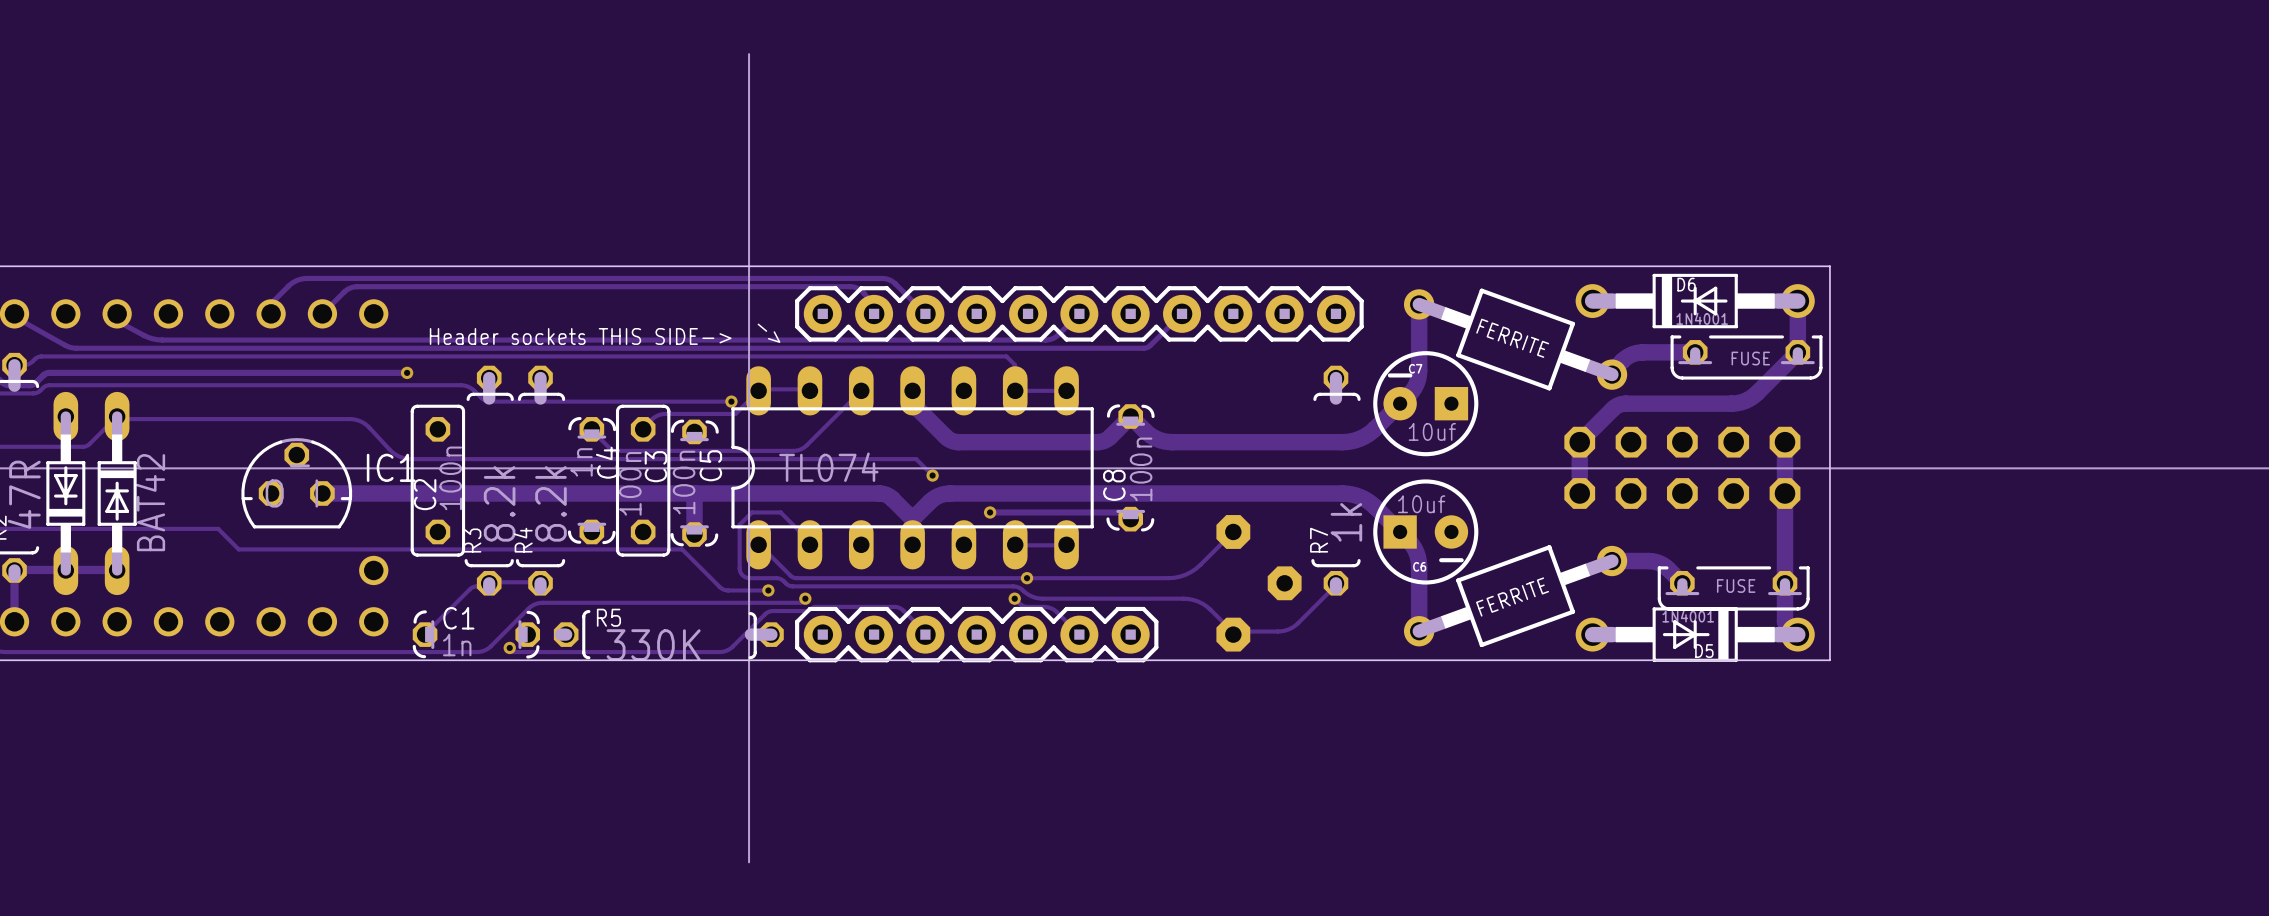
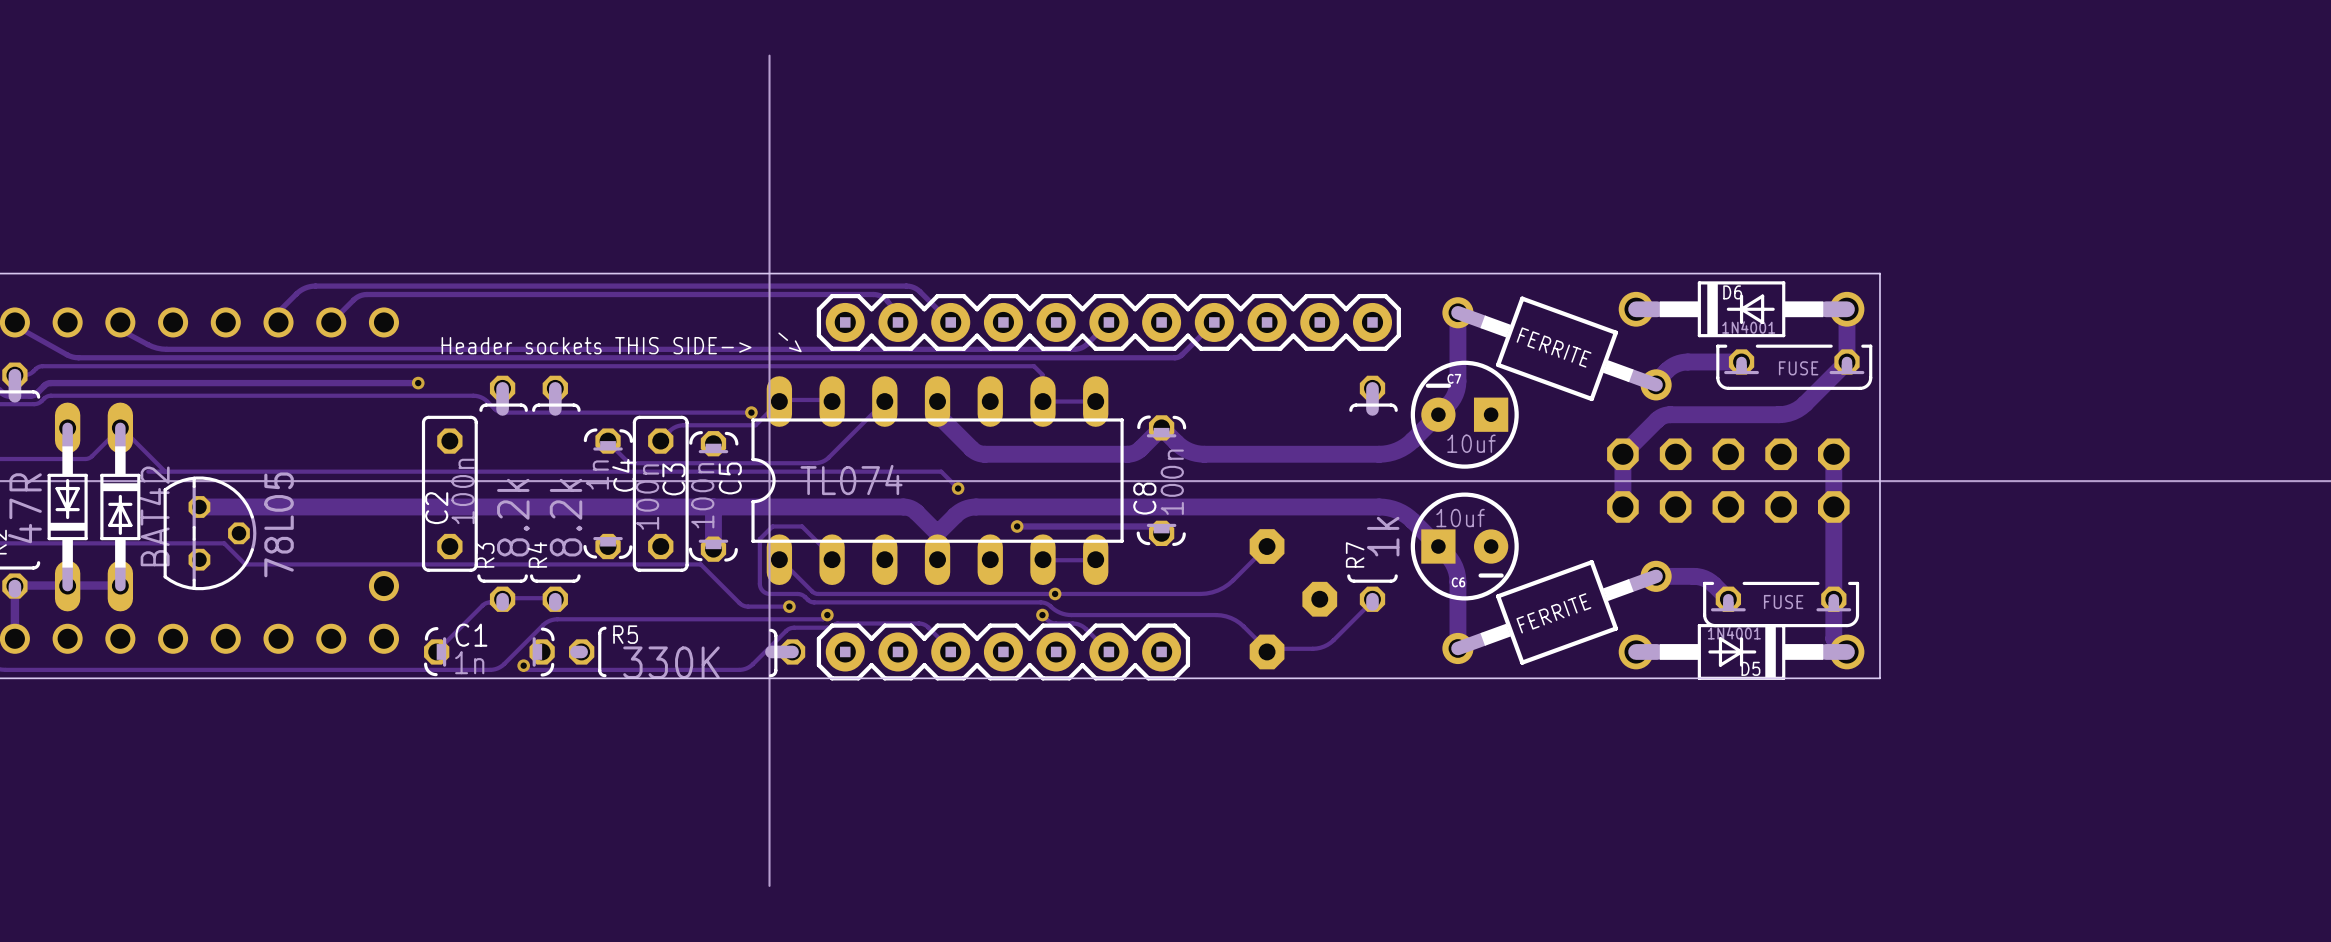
track: (117, 416) (119, 419) (352, 419) (367, 425) (394, 453) (411, 459) -> (148, 471) (422, 471)
track: none -> (120, 427) (165, 471)
IC1: (296, 483) -> none
track: none -> (199, 506) (331, 506)
part: none -> 78L05 (209, 533)

